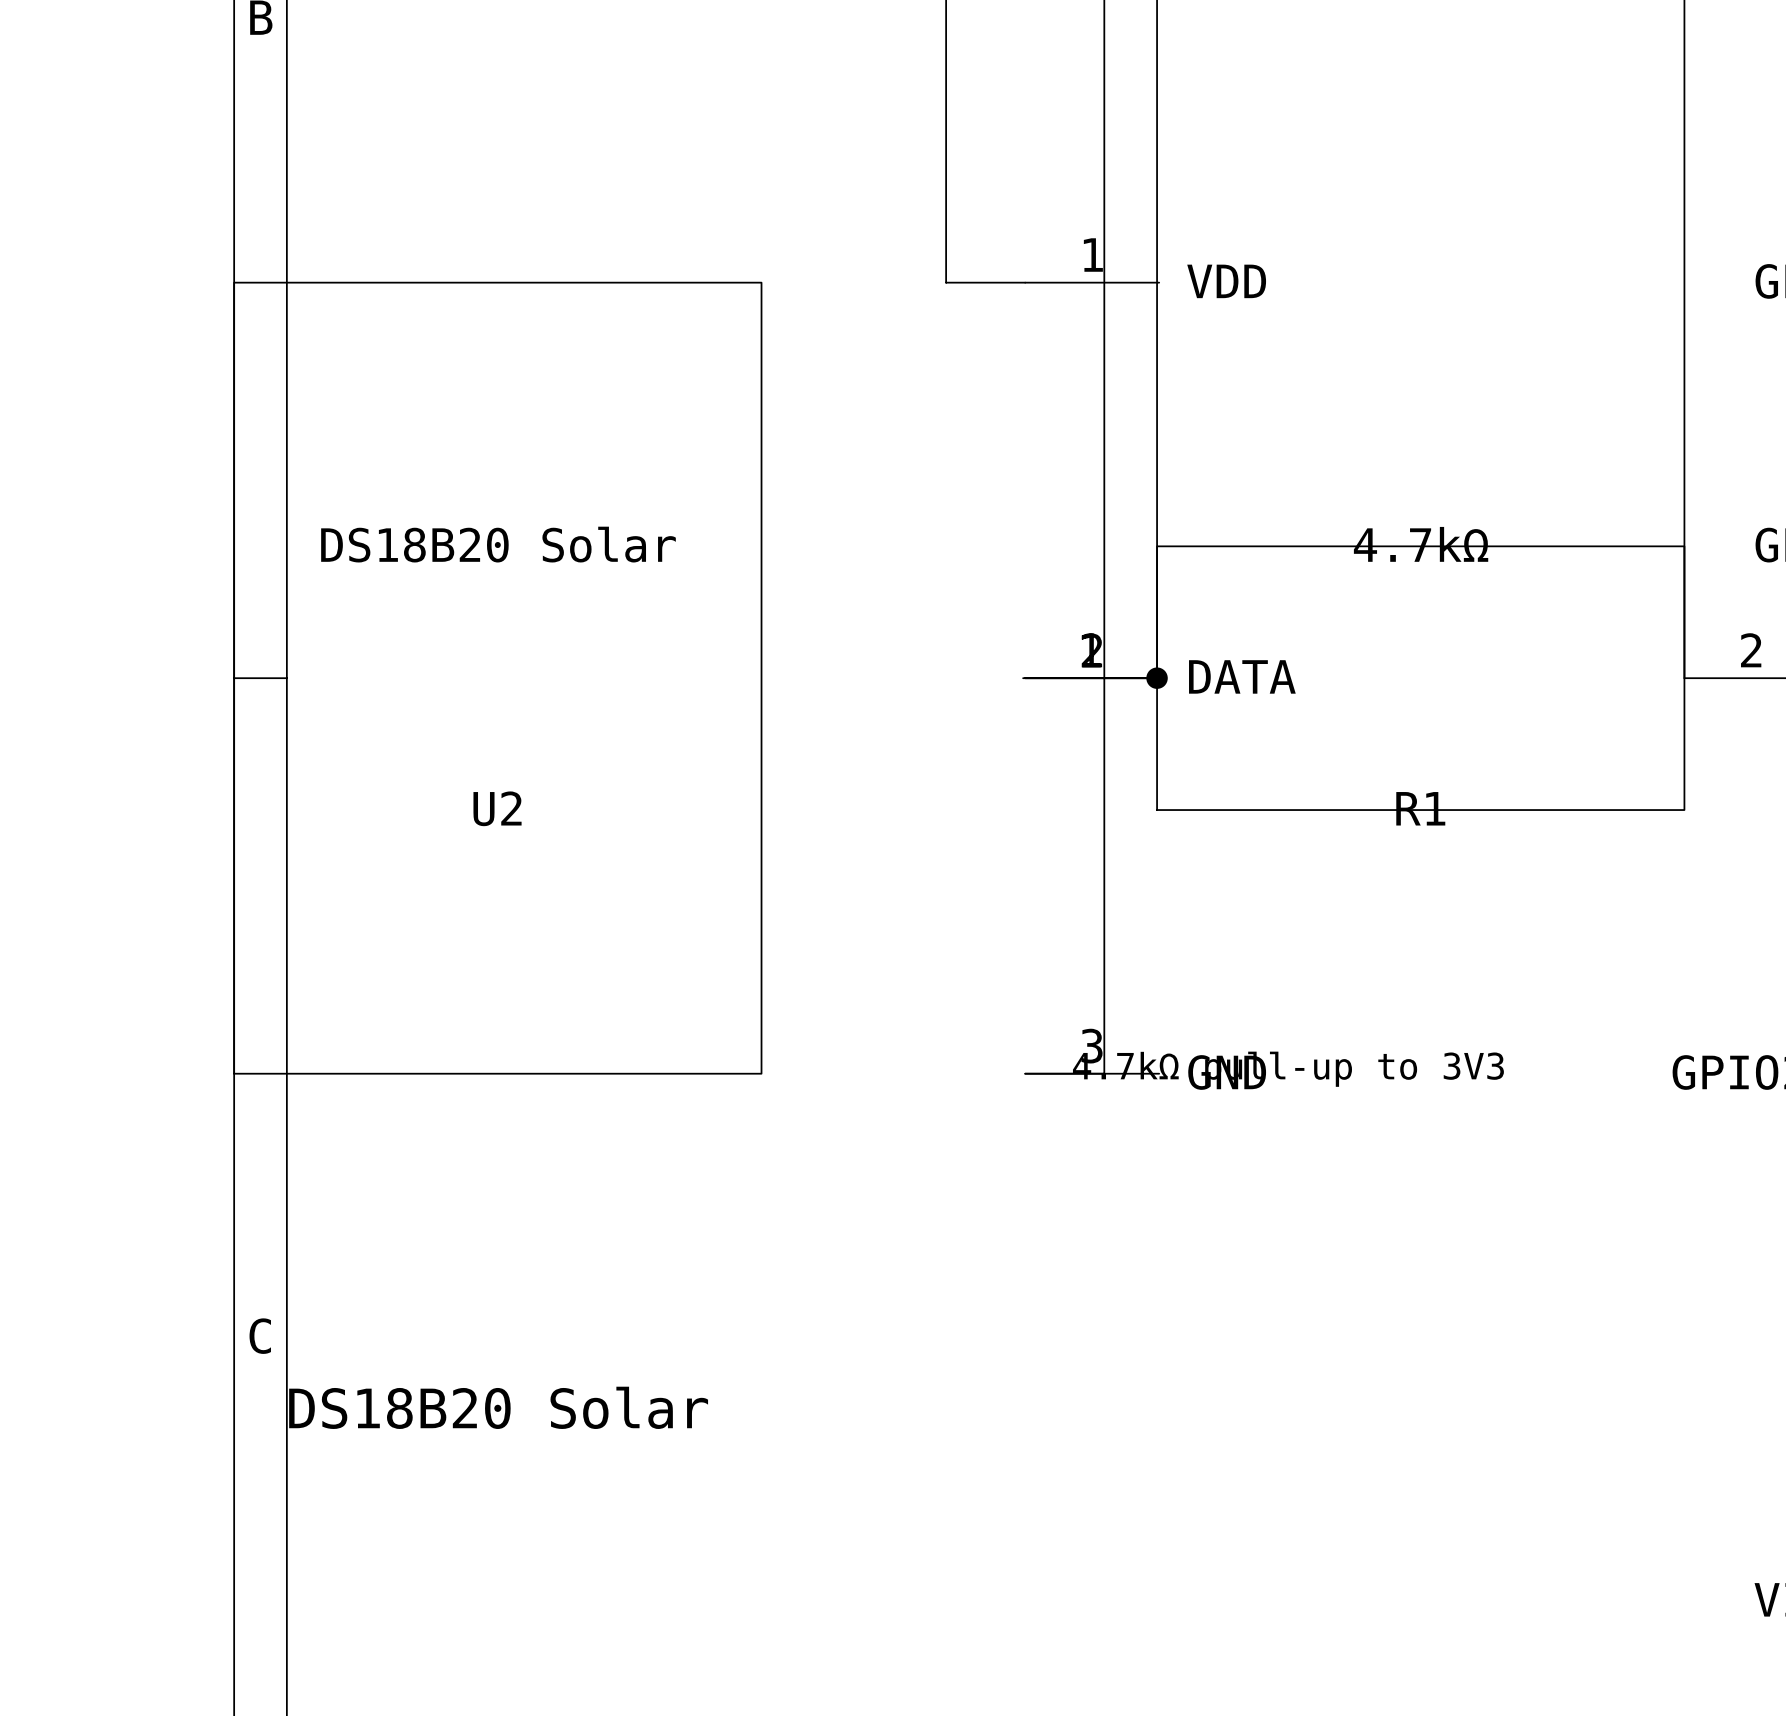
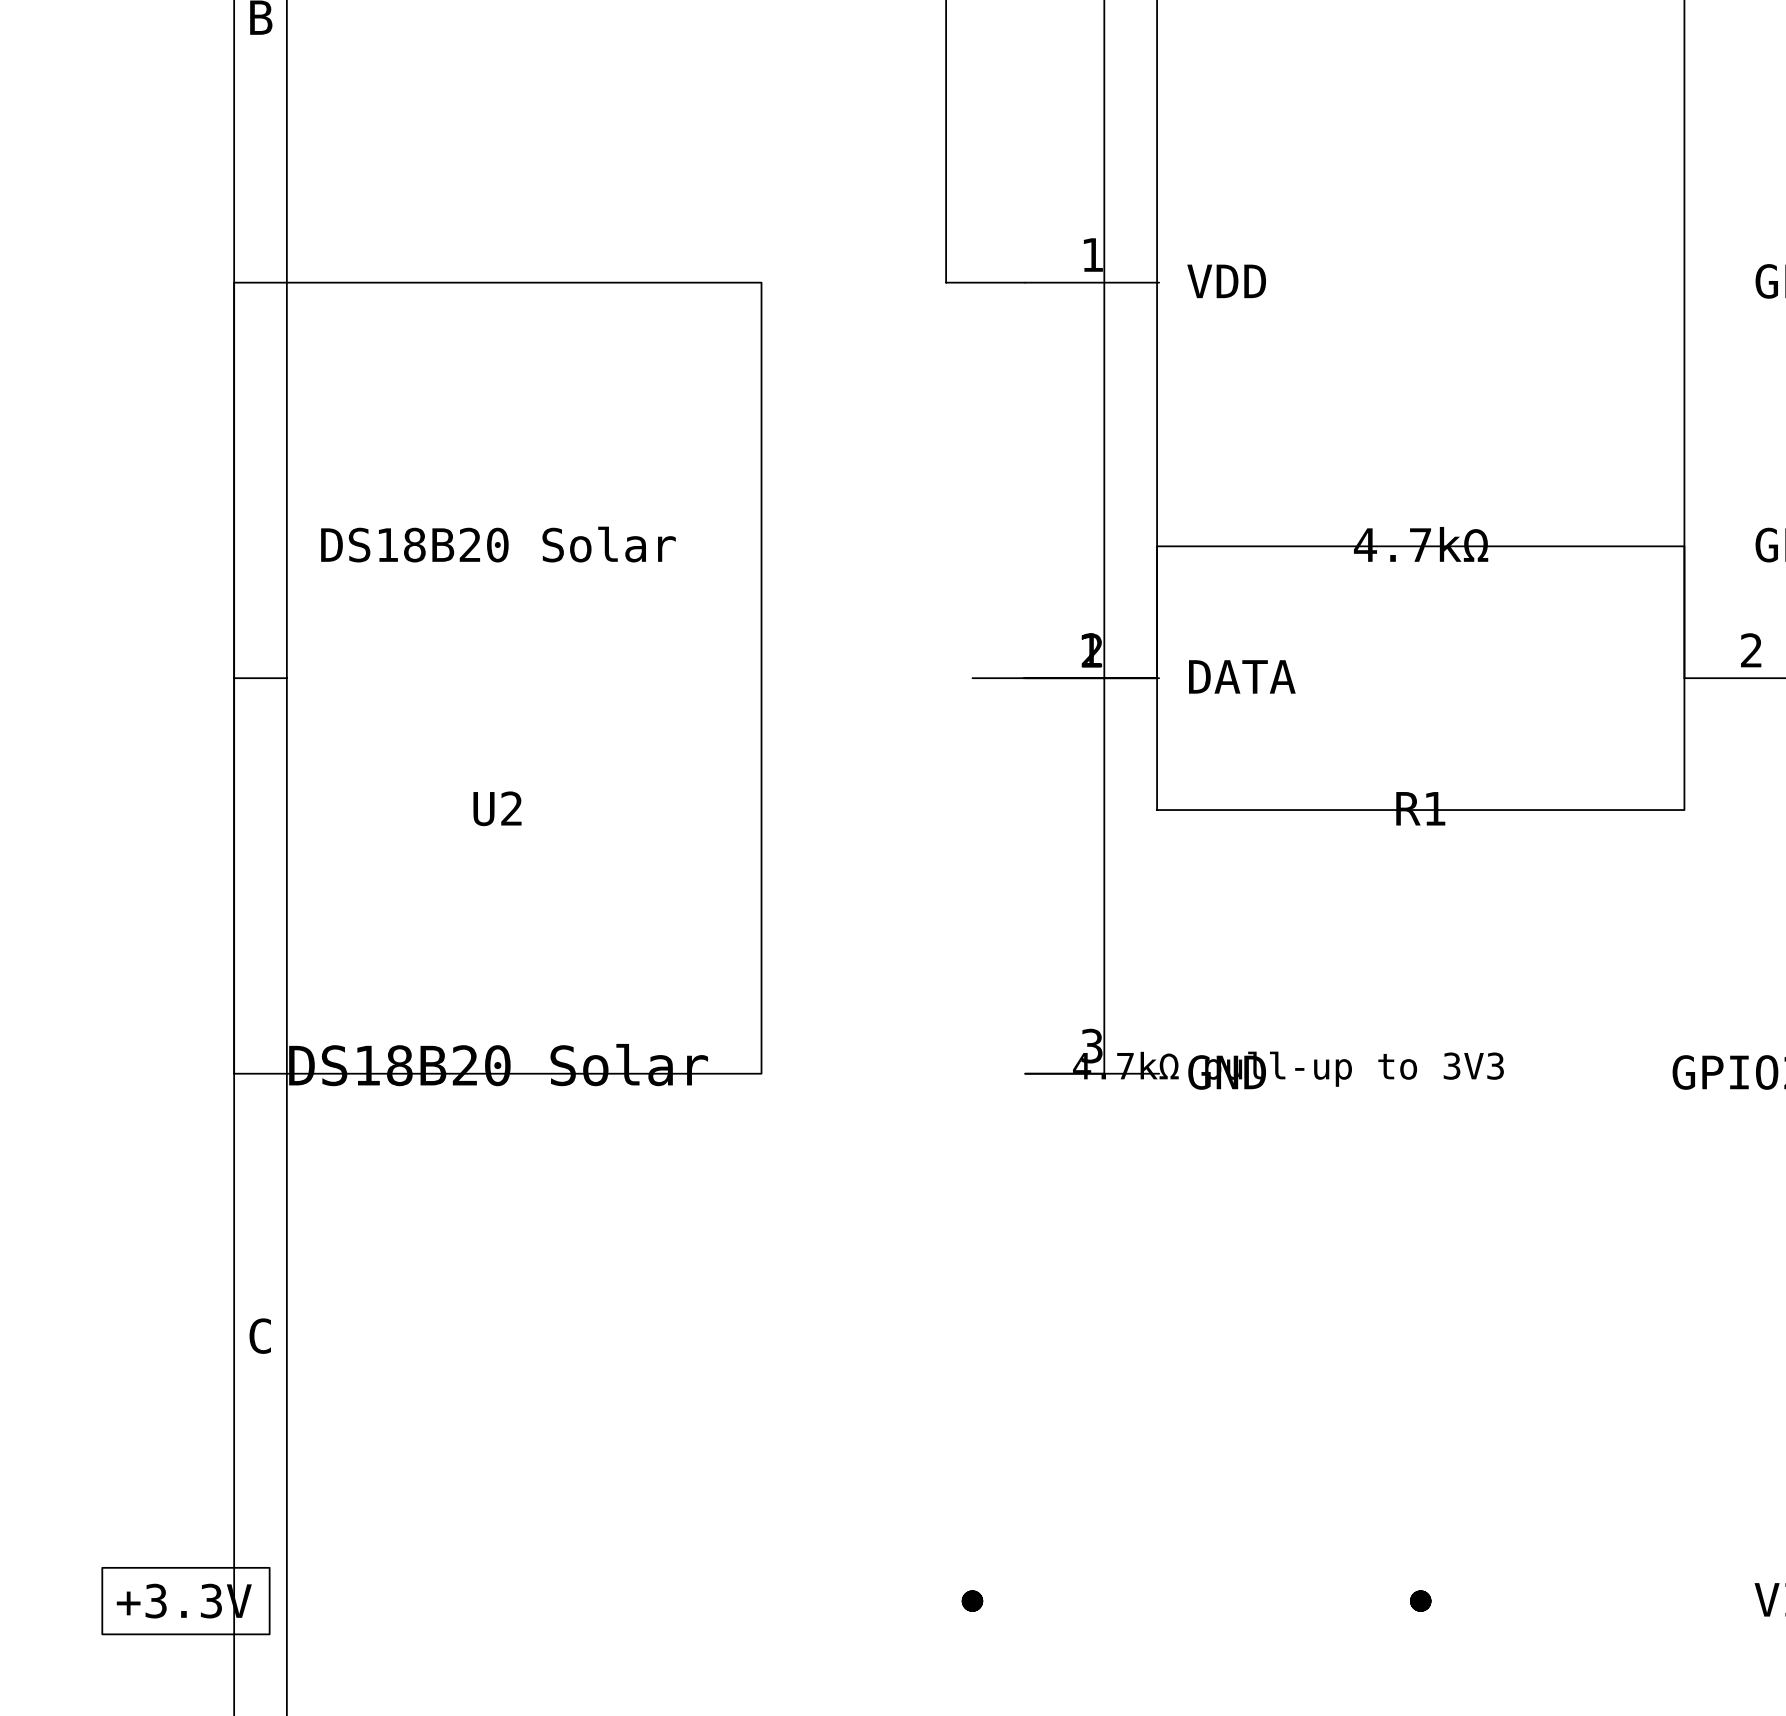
wire: none -> (972, 678) (1025, 678)
junction: (1157, 678) -> none
text position: DS18B20 Solar (498, 1407) -> DS18B20 Solar (498, 1065)
global label: none -> +3.3V (184, 1601)
junction: none -> (972, 1601)
junction: none -> (1420, 1601)

